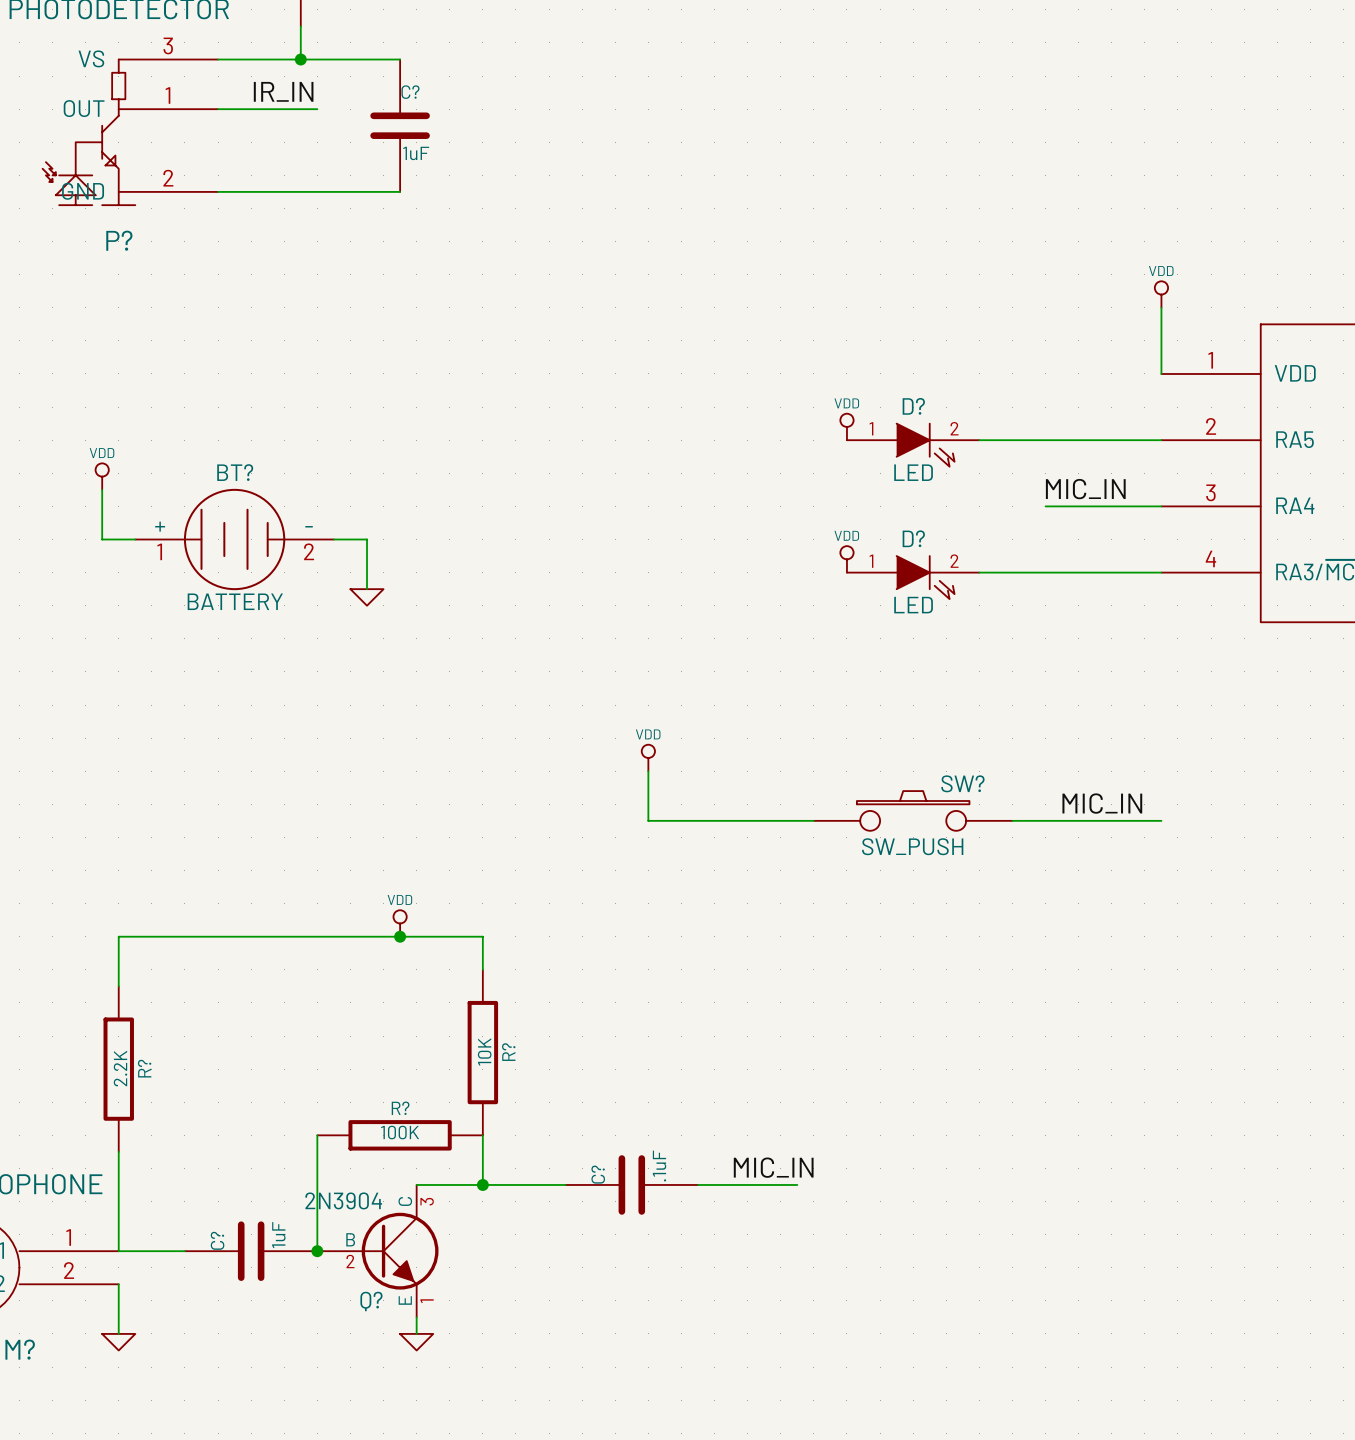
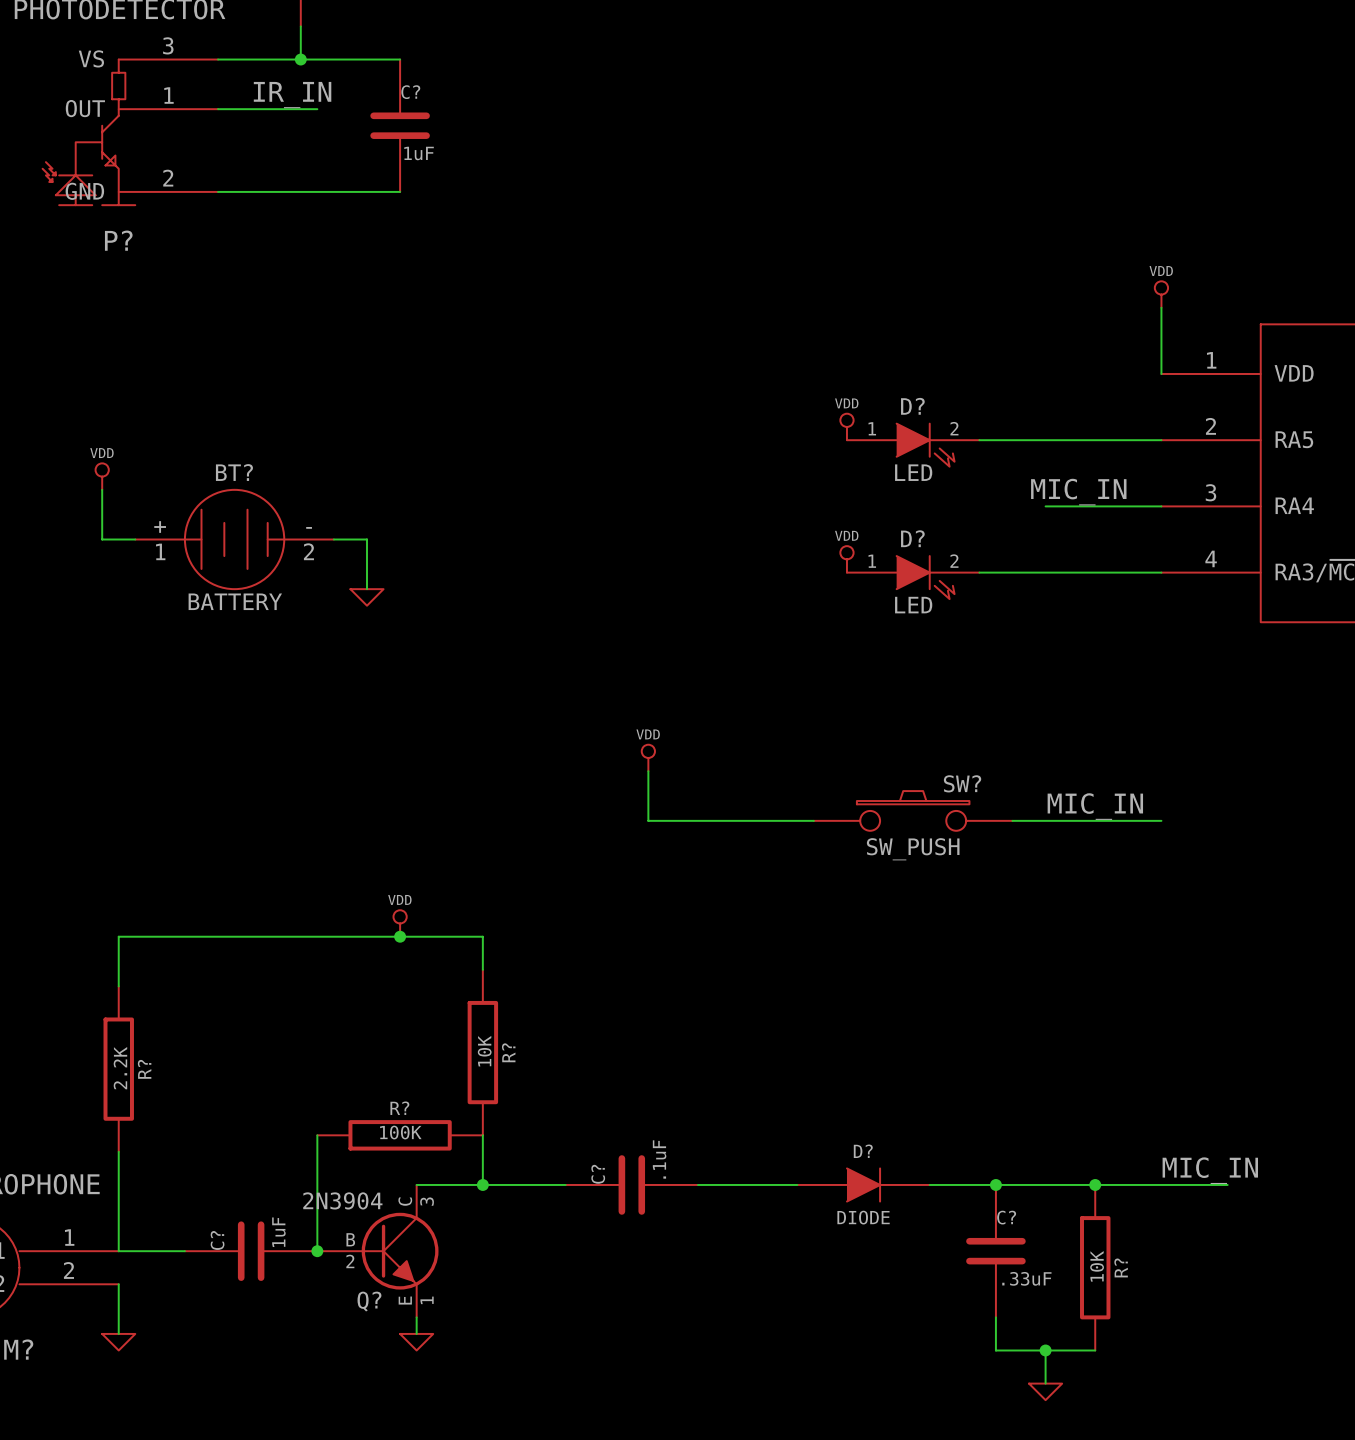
label: MIC_IN (773, 1167) -> none
label: none -> MIC_IN (1210, 1170)
D?: none -> DIODE (863, 1184)
wire: none -> (929, 1184) (1227, 1184)
junction: none -> (995, 1184)
junction: none -> (1095, 1184)
C?: none -> .33uF (995, 1251)
R?: none -> 10K (1095, 1267)
wire: none -> (995, 1317) (995, 1350) (1095, 1350)
wire: none -> (1045, 1350) (1045, 1383)
junction: none -> (1045, 1350)
power symbol: none -> (1045, 1391)

